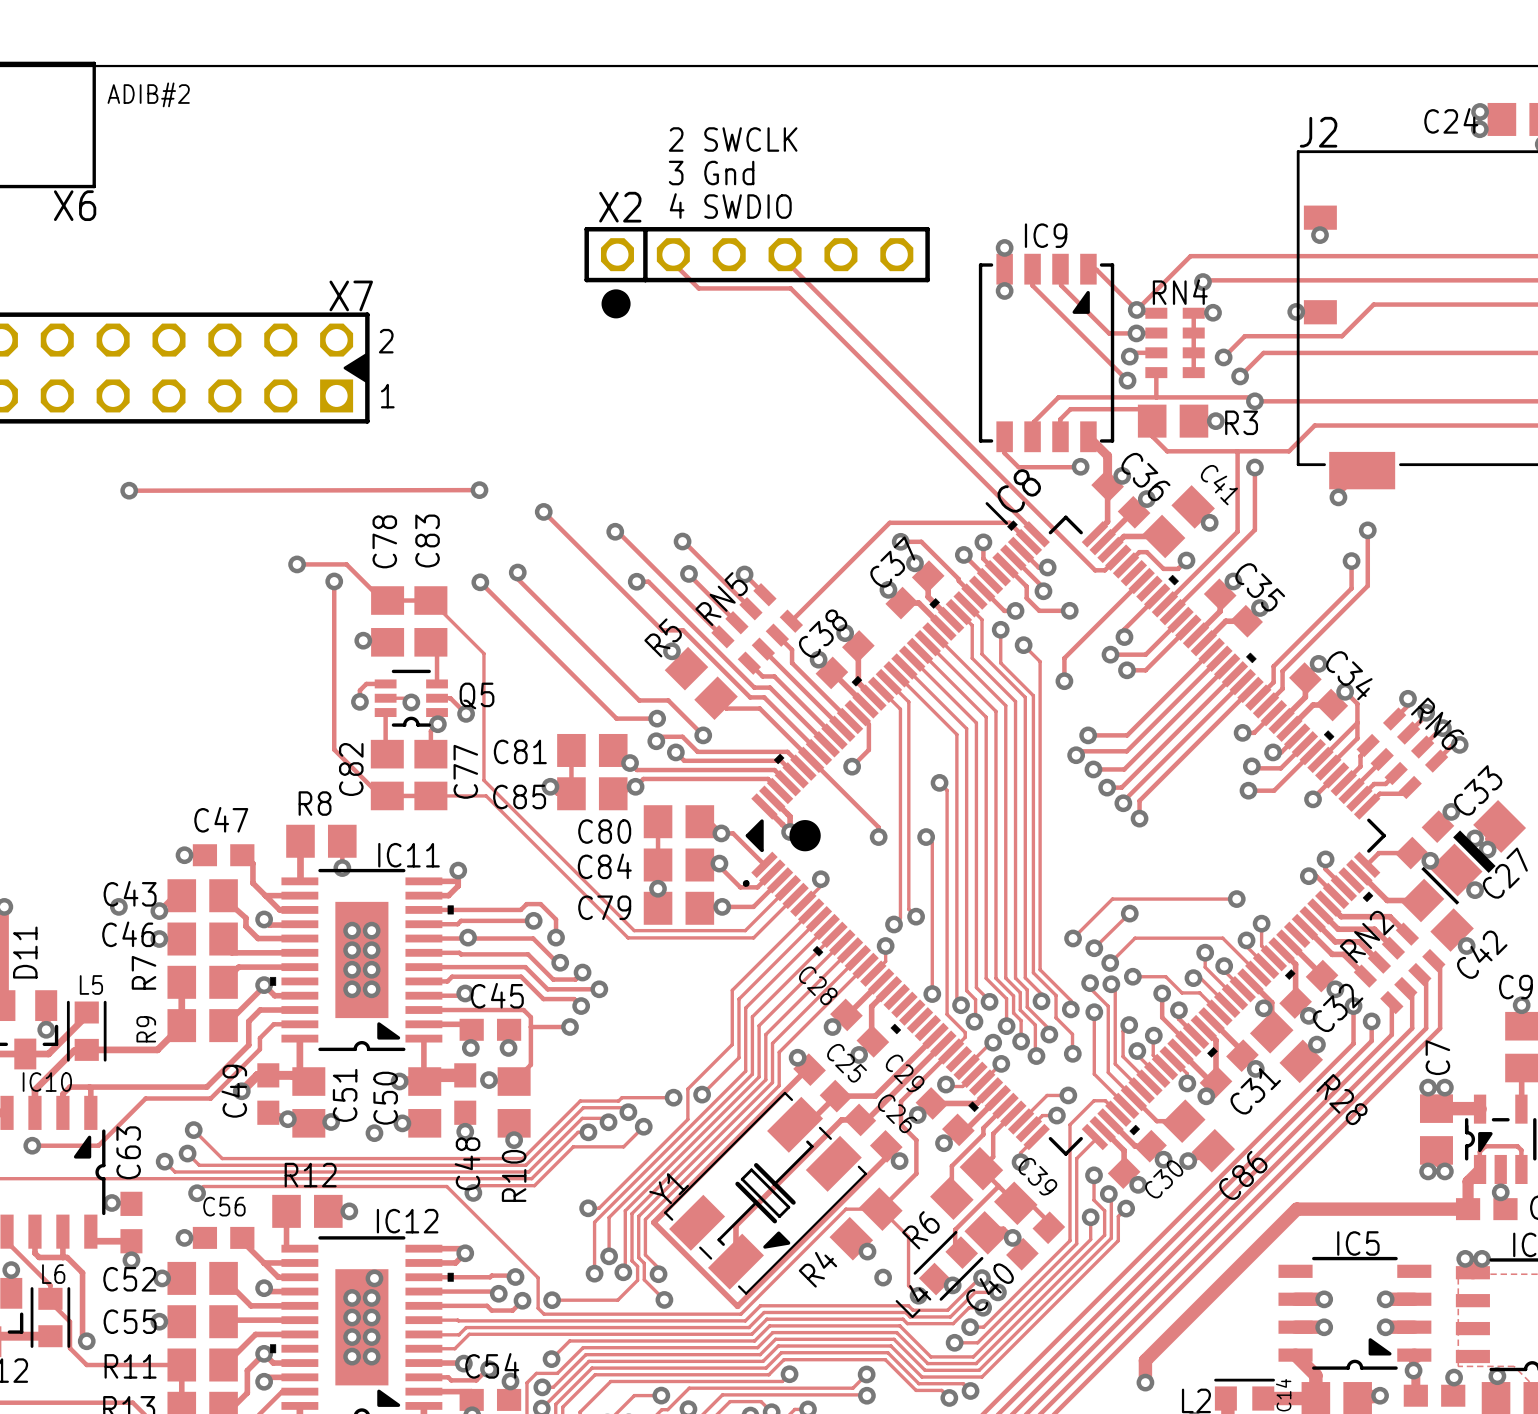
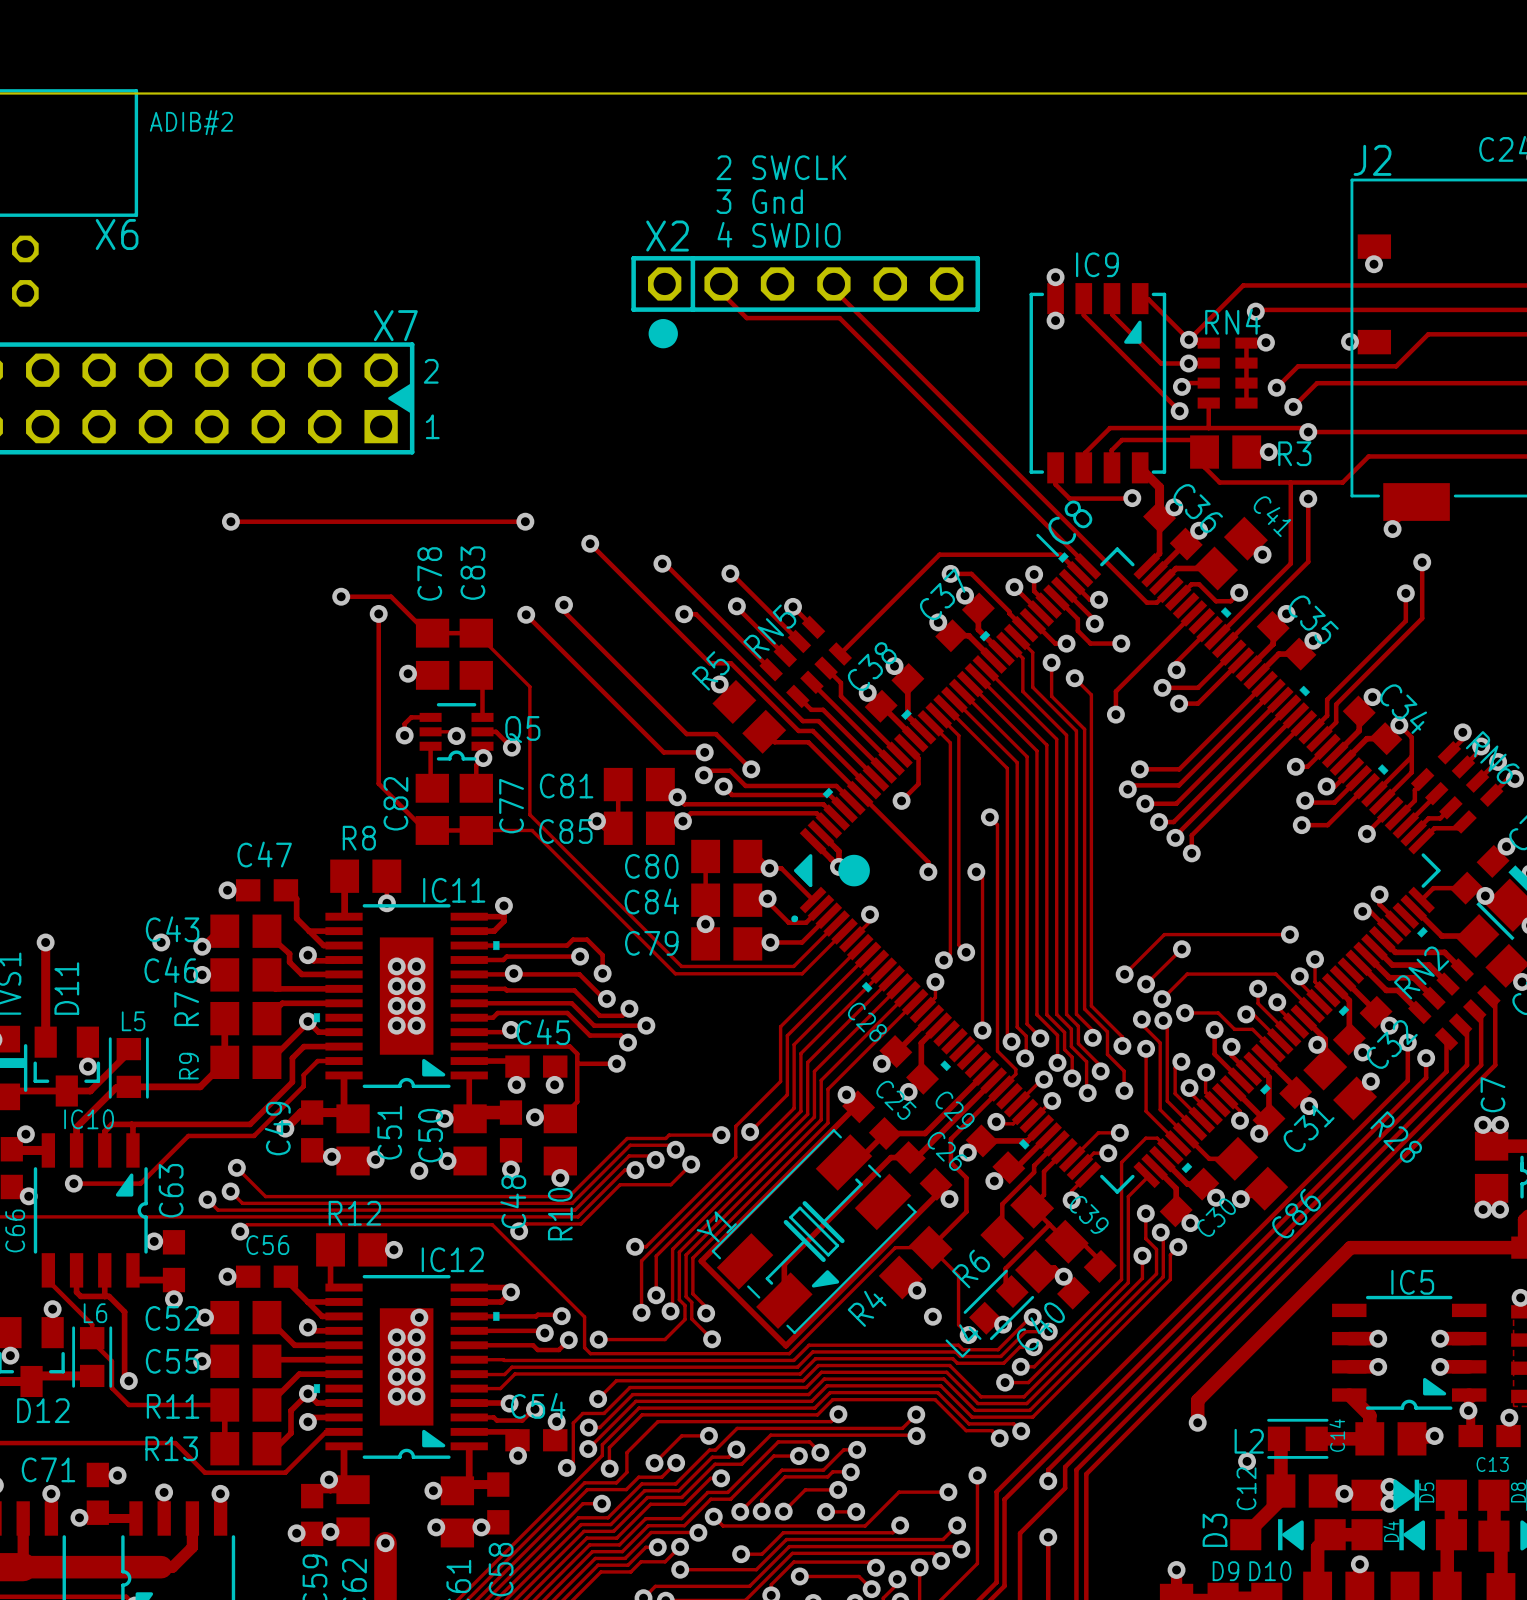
via position: (129, 490) -> (230, 521)
track: (479, 490) (129, 490) -> (525, 521) (230, 521)

